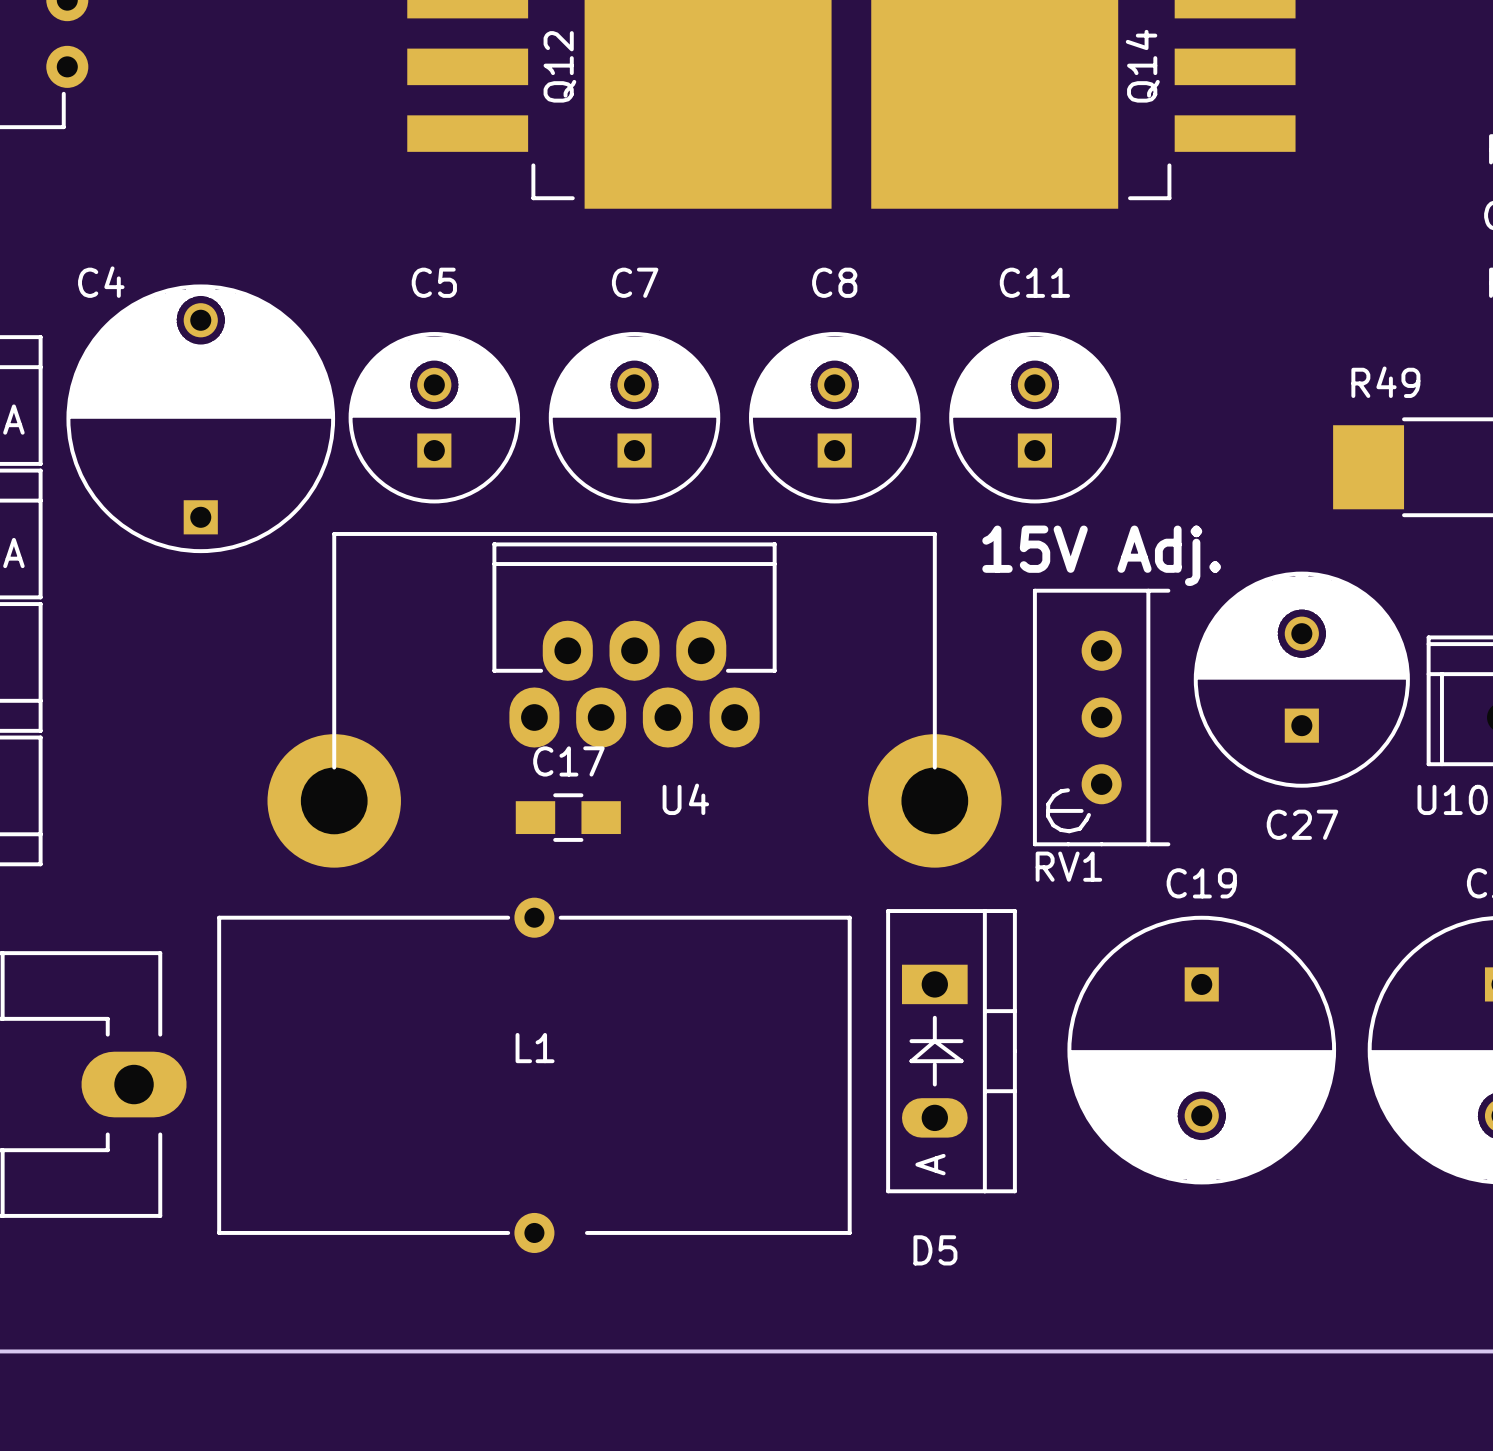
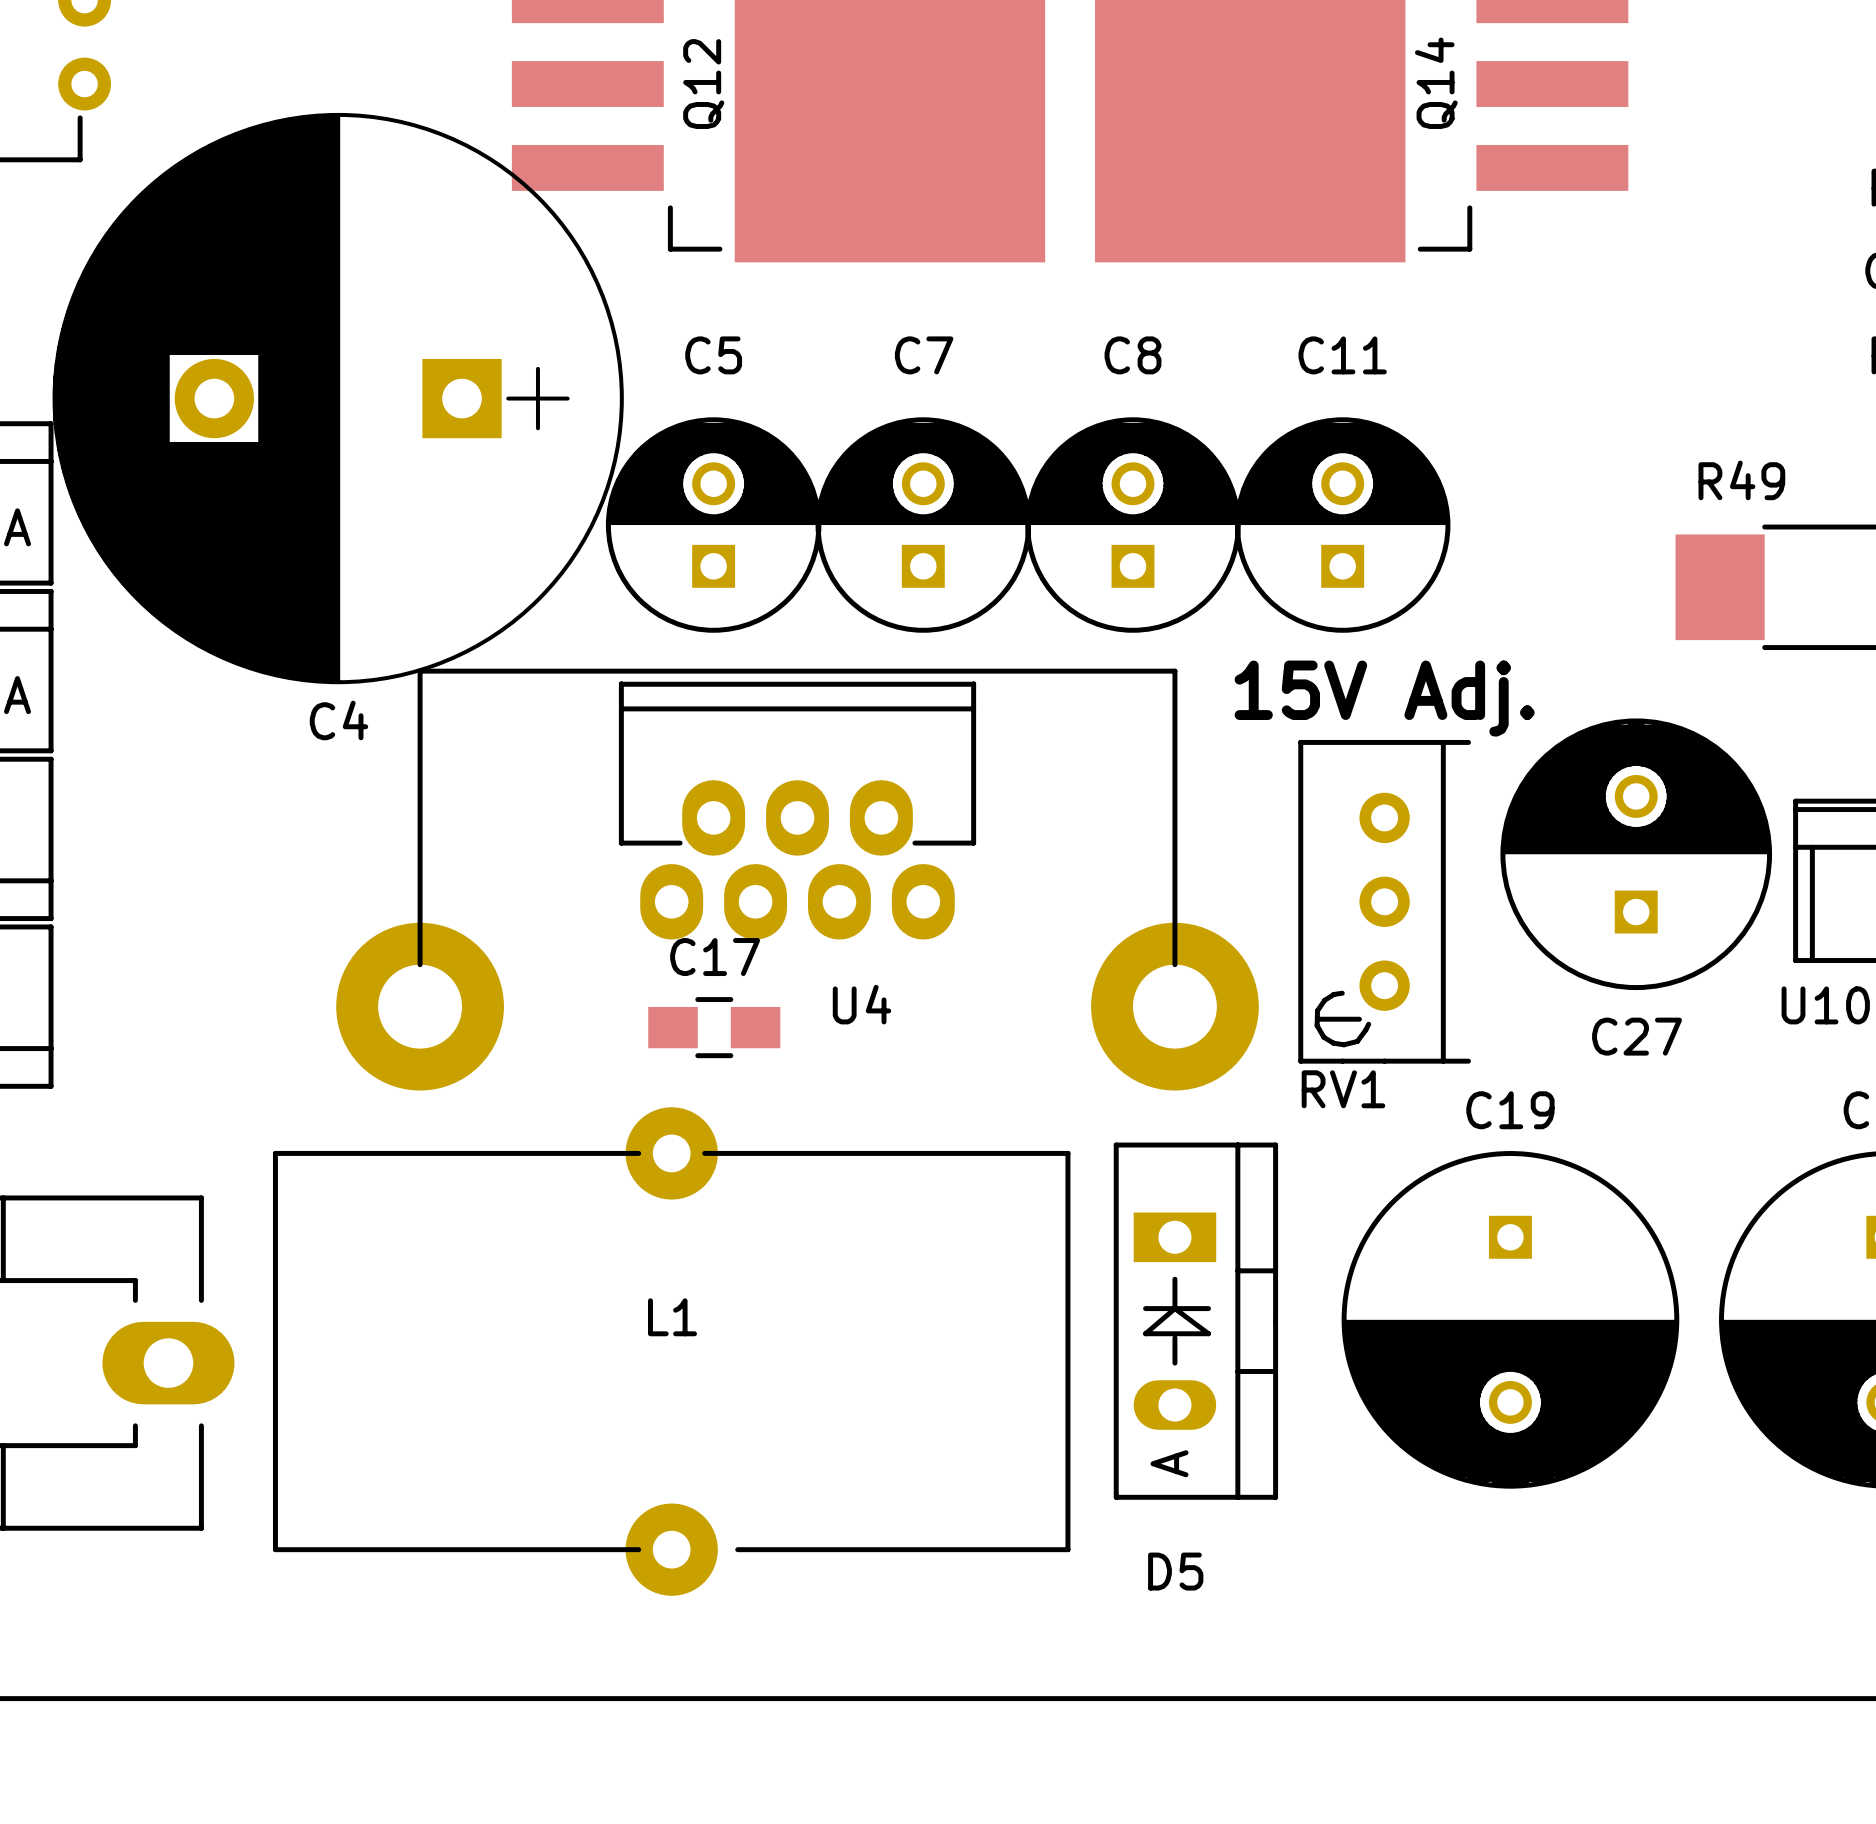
C4 name position: C4 (101, 282) -> C4 (338, 720)
C4 footprint: [66, 284, 336, 554] -> [52, 112, 624, 685]
C5 position: (434, 417) -> (713, 525)
C7 position: (634, 417) -> (923, 525)
C8 position: (834, 417) -> (1133, 525)
C11 position: (1034, 417) -> (1342, 525)
L1 footprint: [217, 897, 852, 1253] -> [272, 1107, 1071, 1596]

